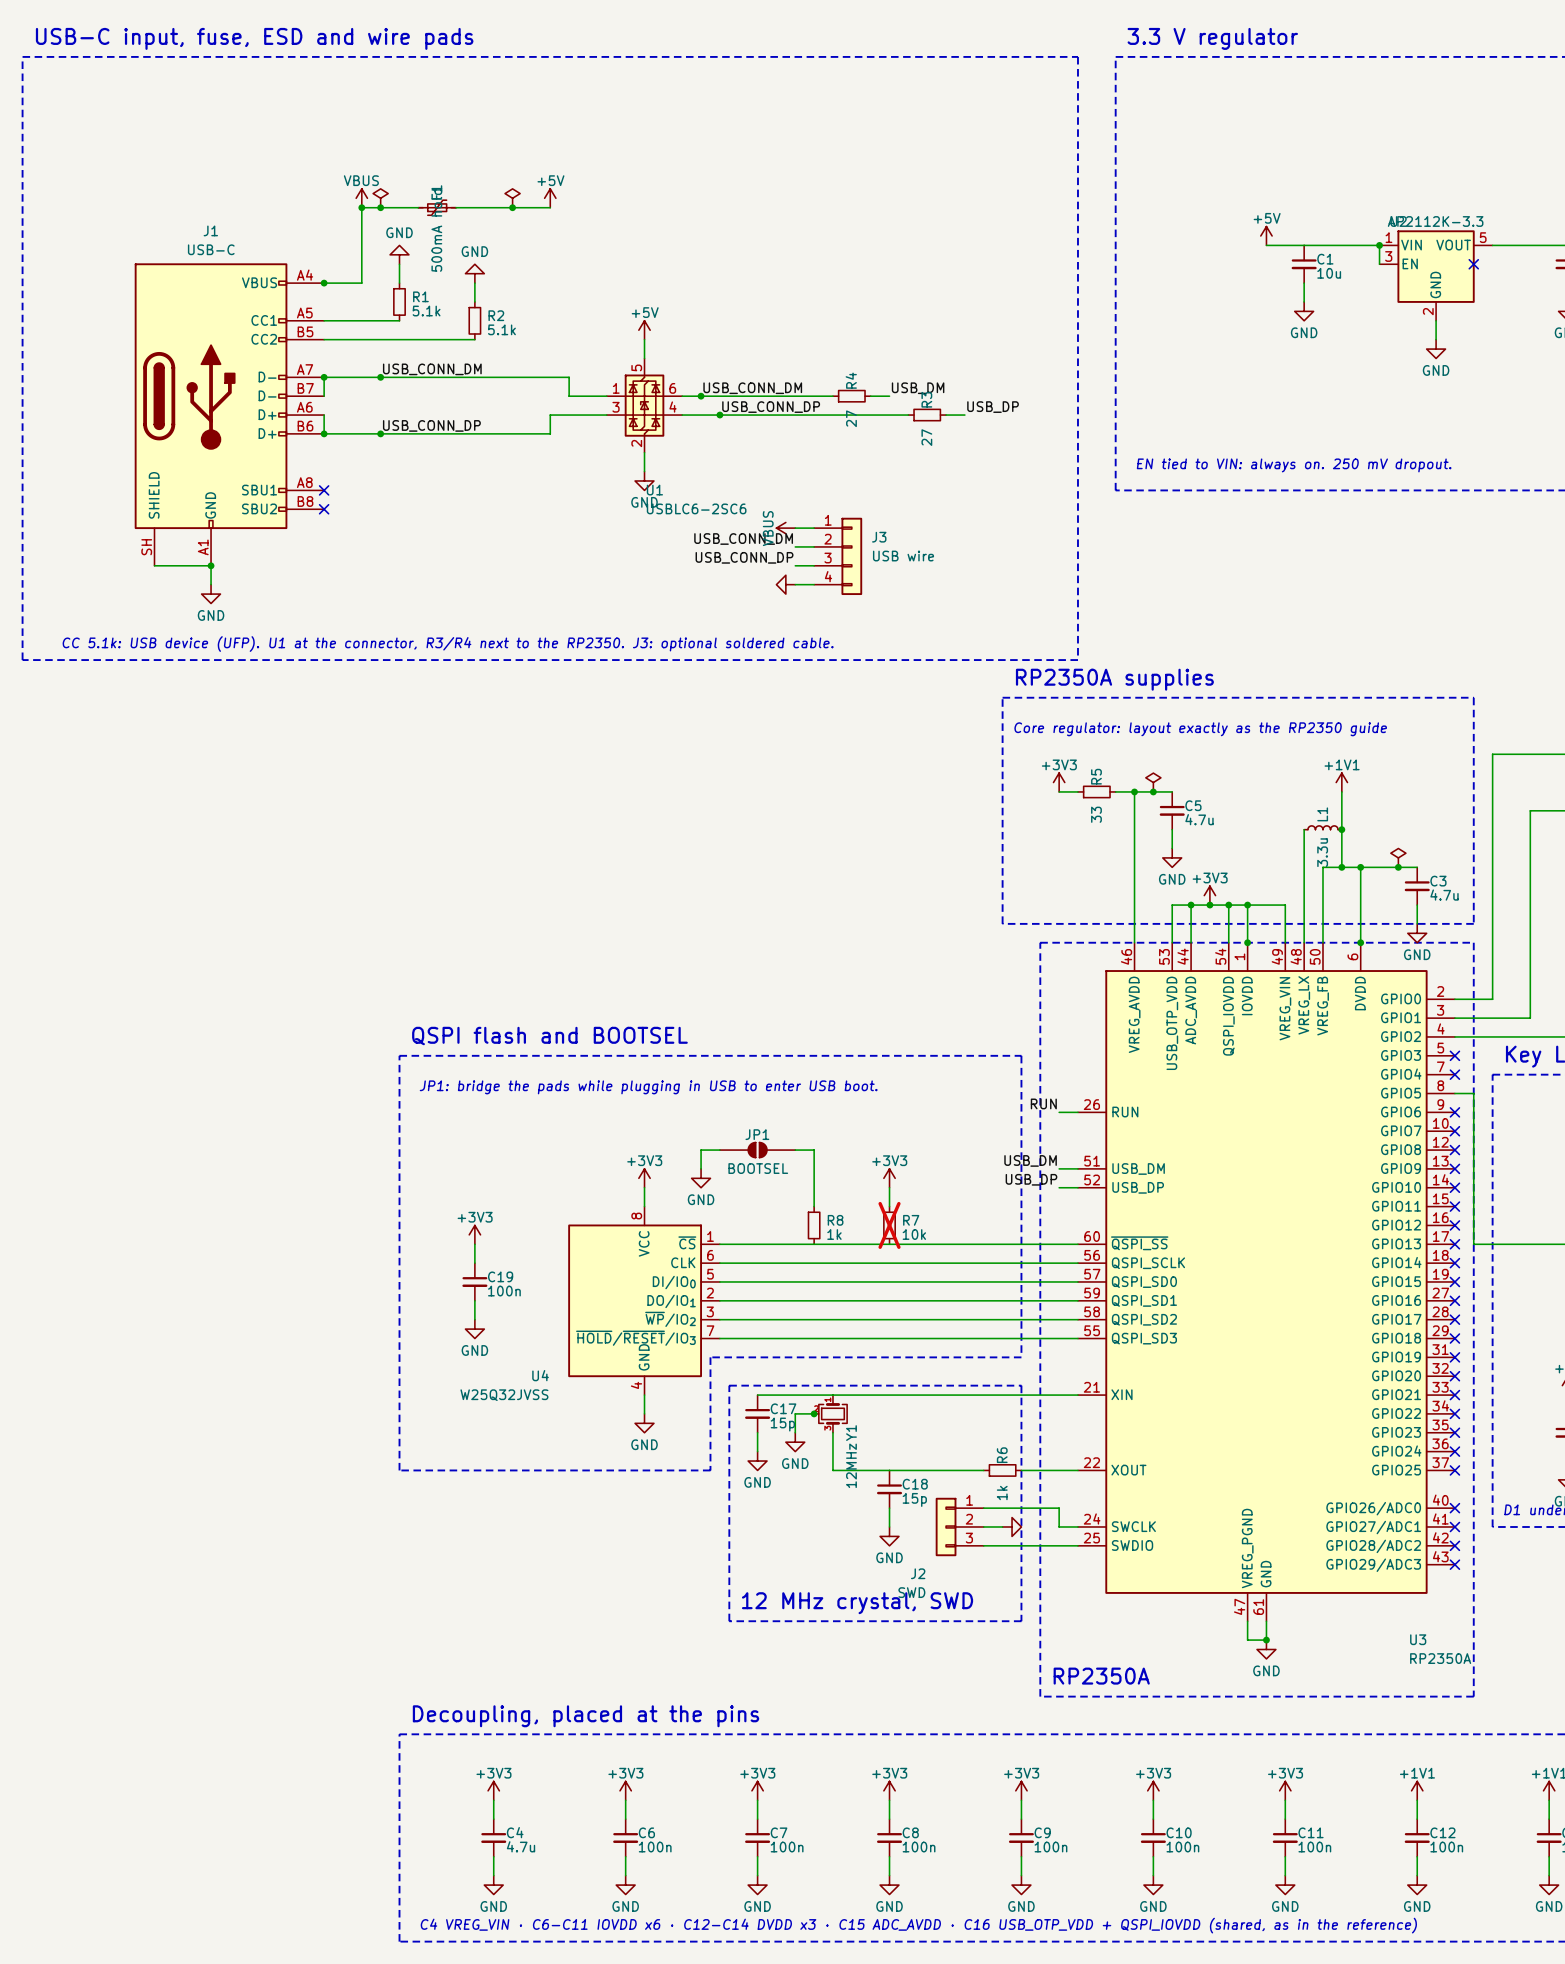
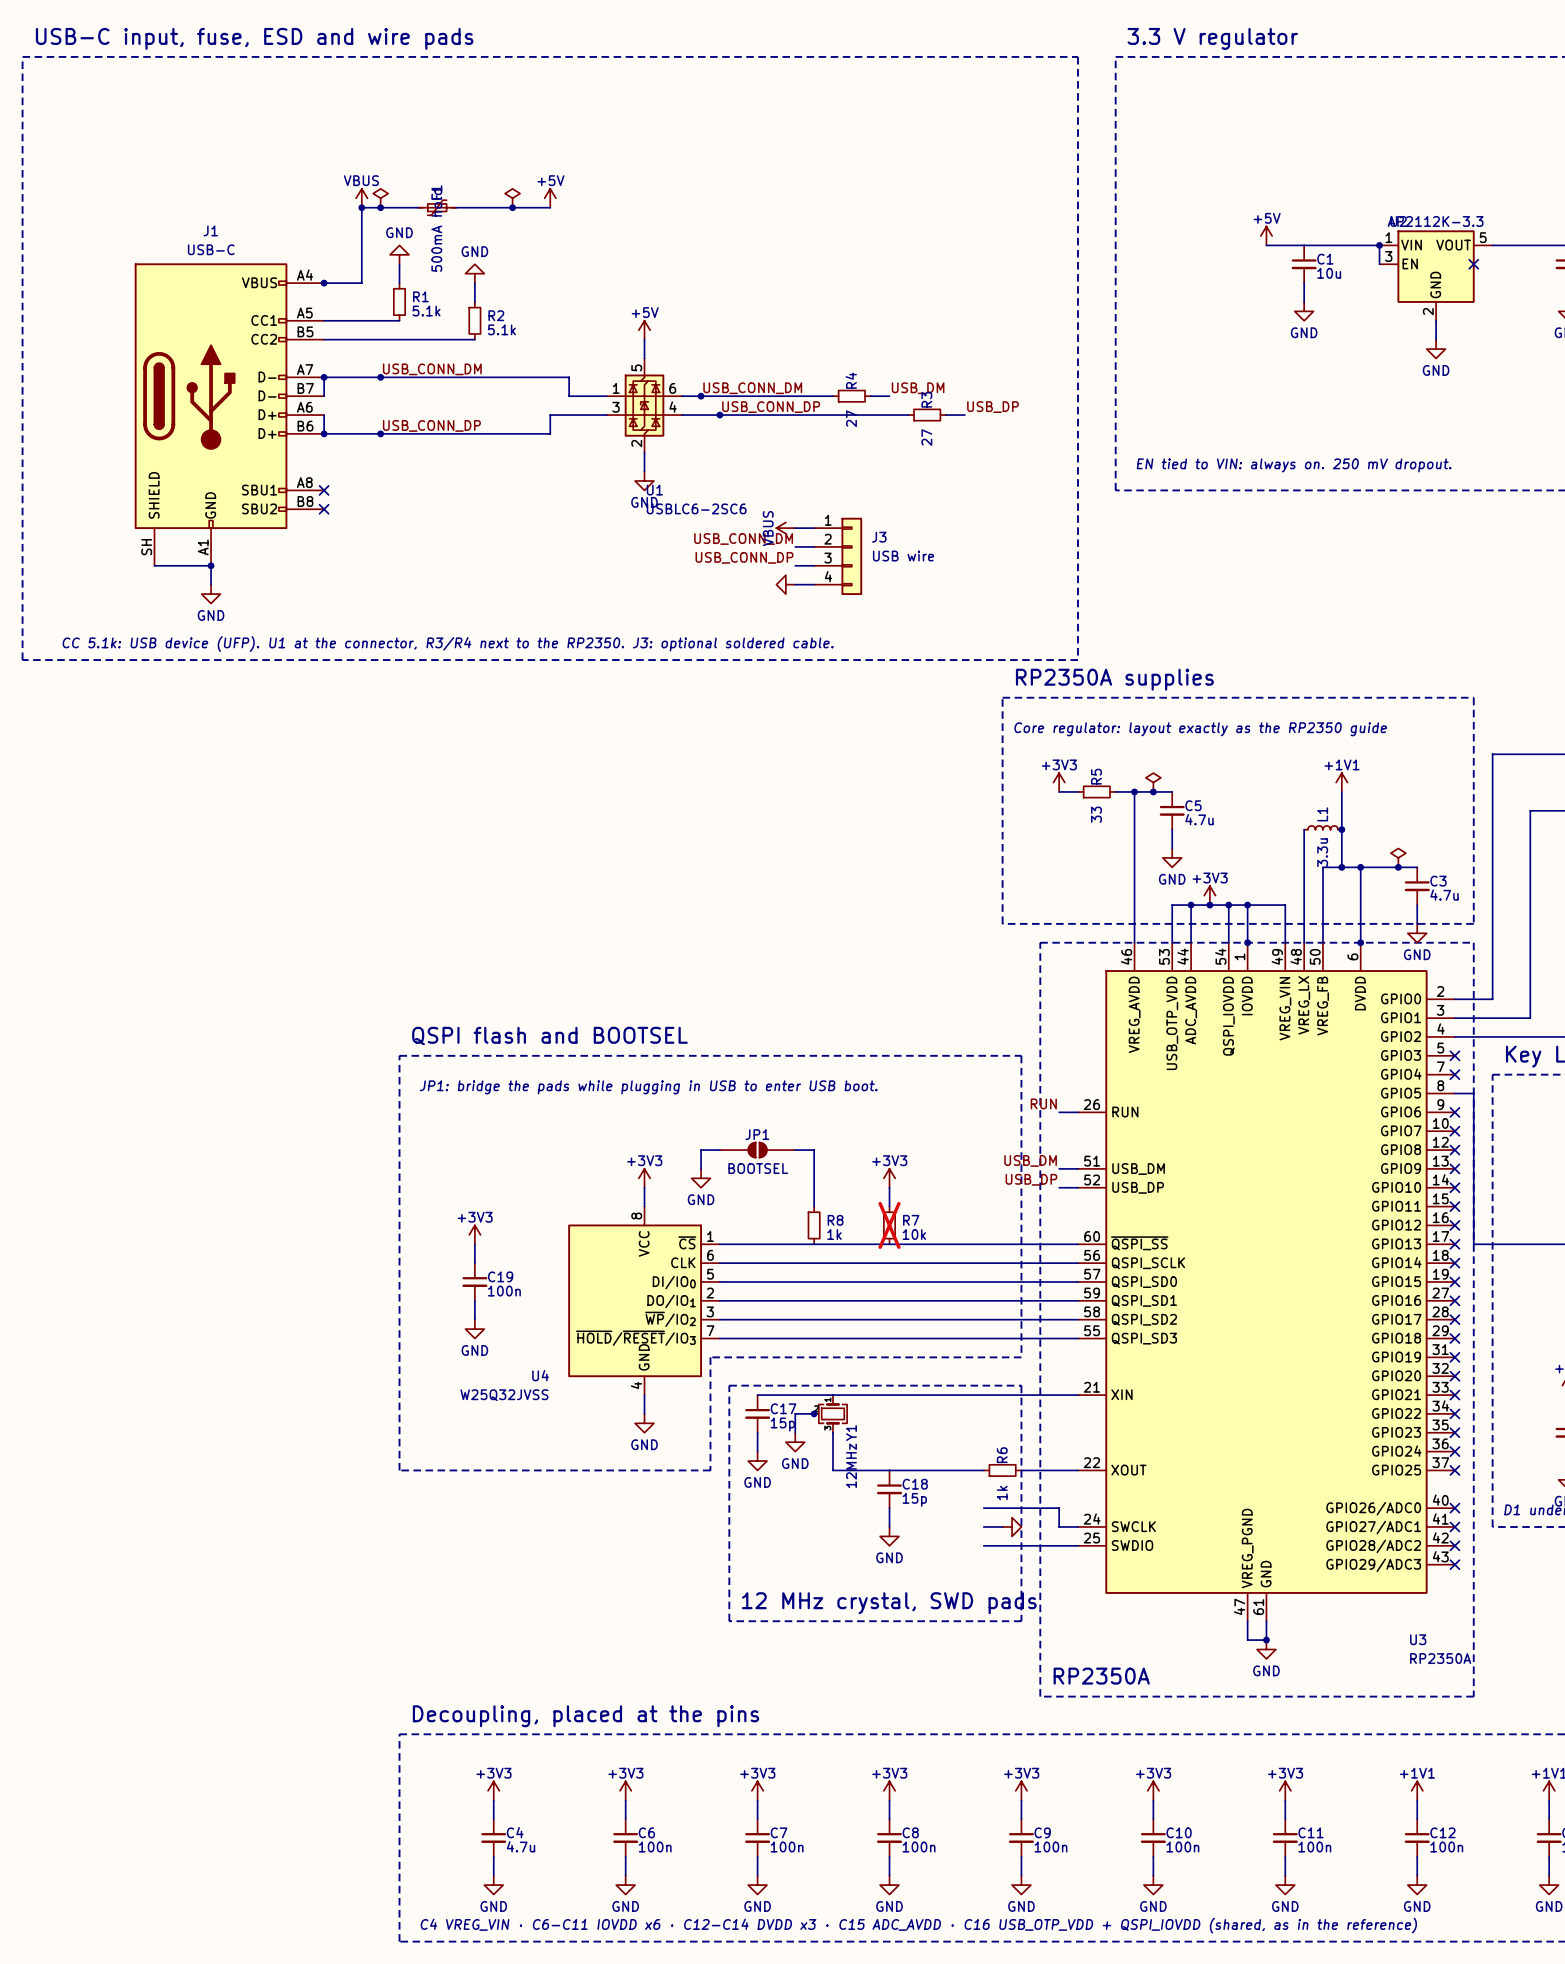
J2: SWD (959, 1526) -> none
text: 12 MHz crystal, SWD (857, 1603) -> 12 MHz crystal, SWD pads (889, 1603)

